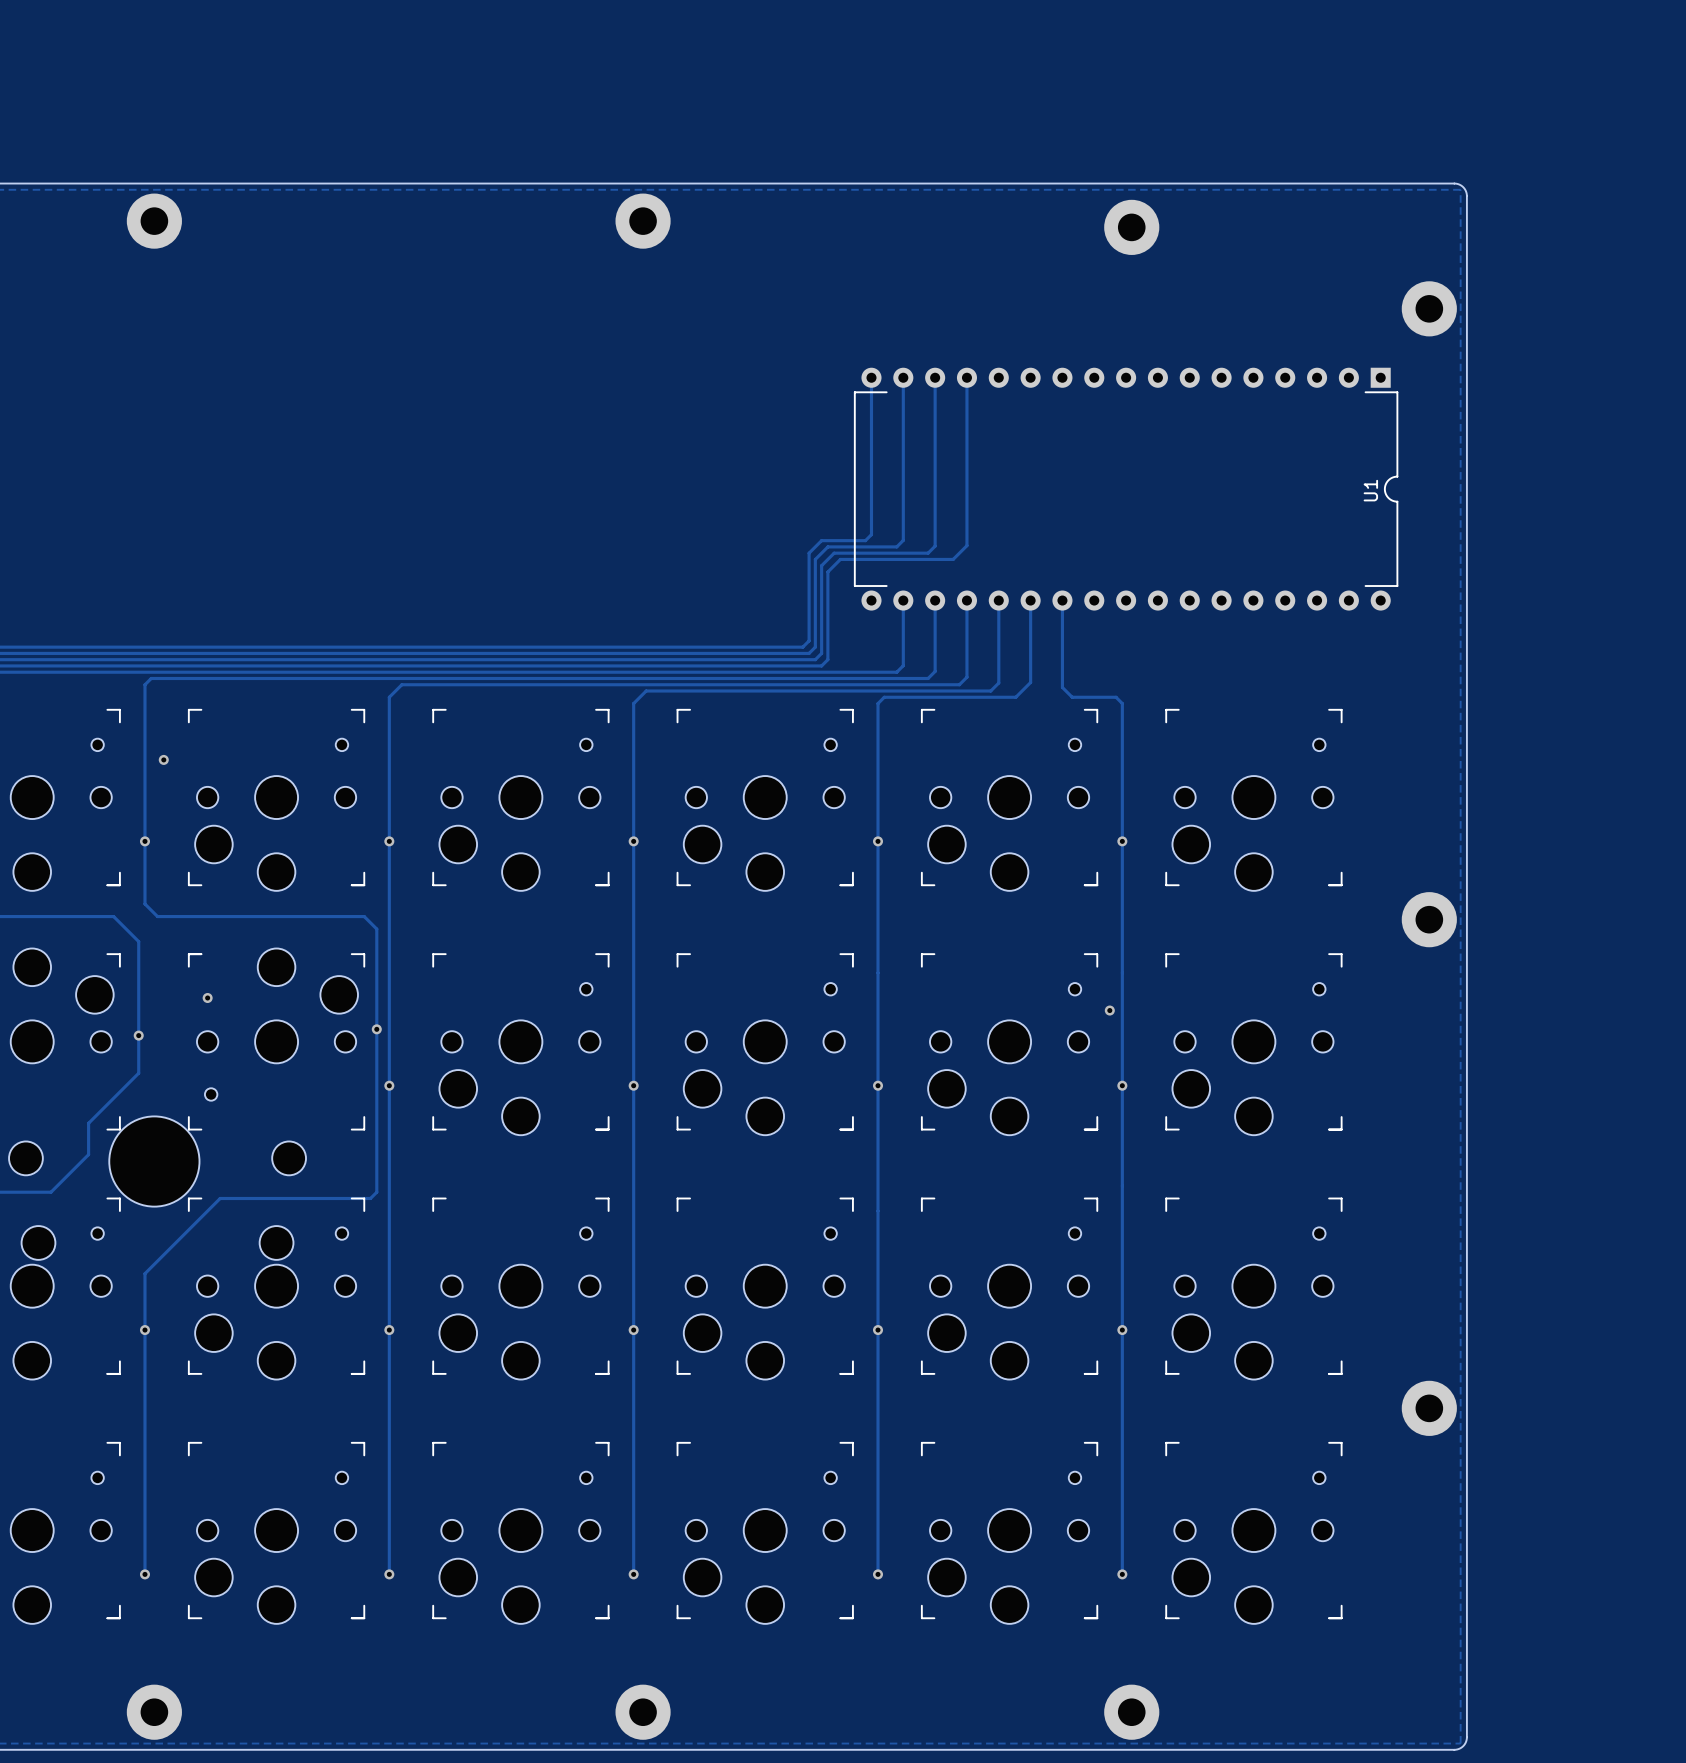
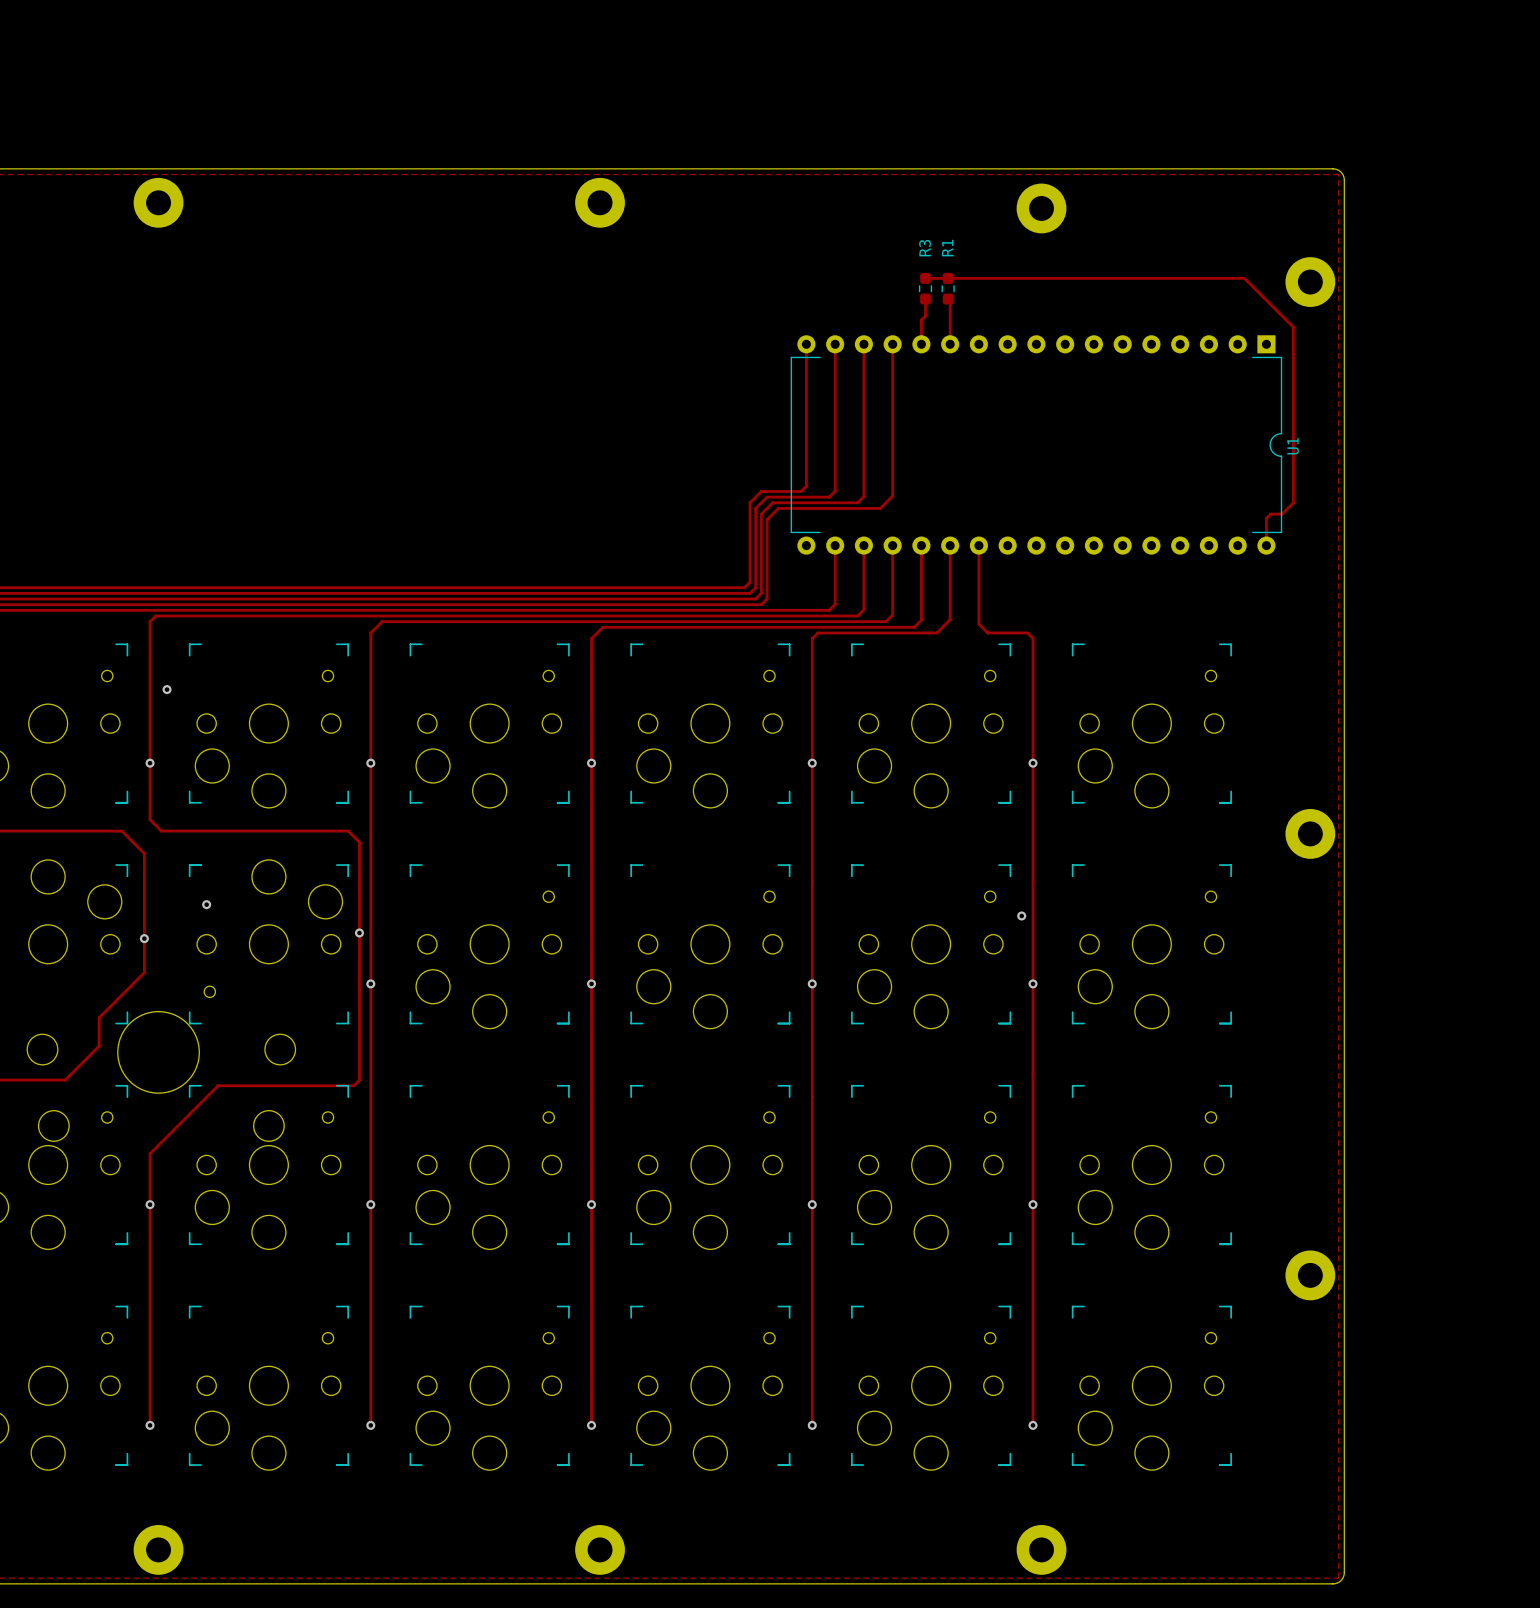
track: none -> (925, 278) (1244, 278) (1293, 327) (1293, 502) (1282, 514) (1270, 514) (1266, 518) (1266, 545)
R3: none -> (925, 288)
R1: none -> (948, 288)
track: none -> (925, 299) (925, 316) (921, 320) (921, 344)
track: none -> (948, 299) (950, 301) (950, 344)
U1 name position: U1 (1370, 490) -> U1 (1293, 446)

